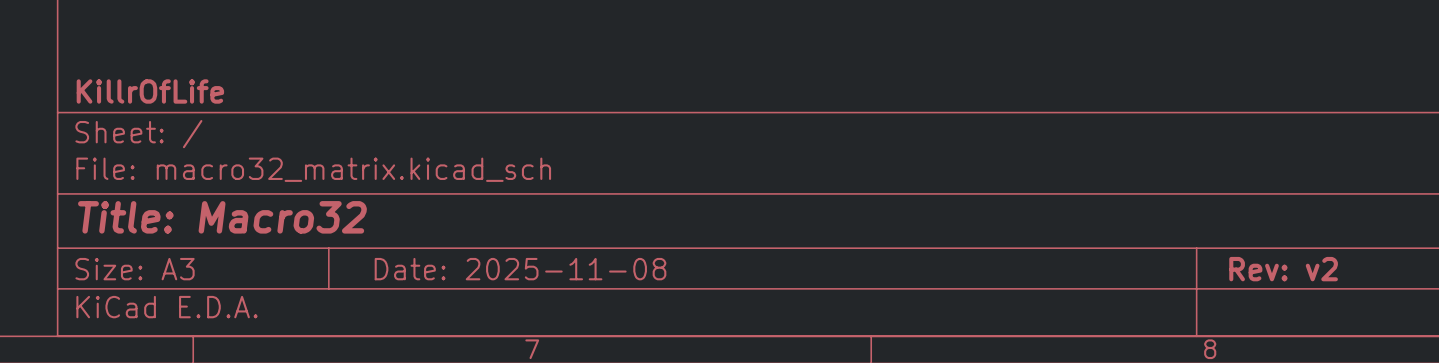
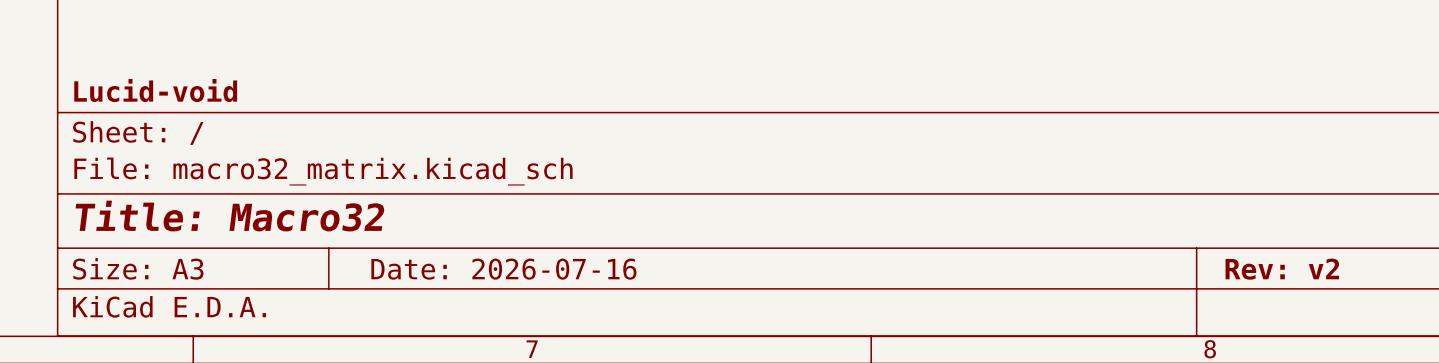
title block: KillrOfLife (150, 91) -> Lucid-void (155, 90)
title block: Date: 2025-11-08 (520, 269) -> Date: 2026-07-16 (503, 269)

